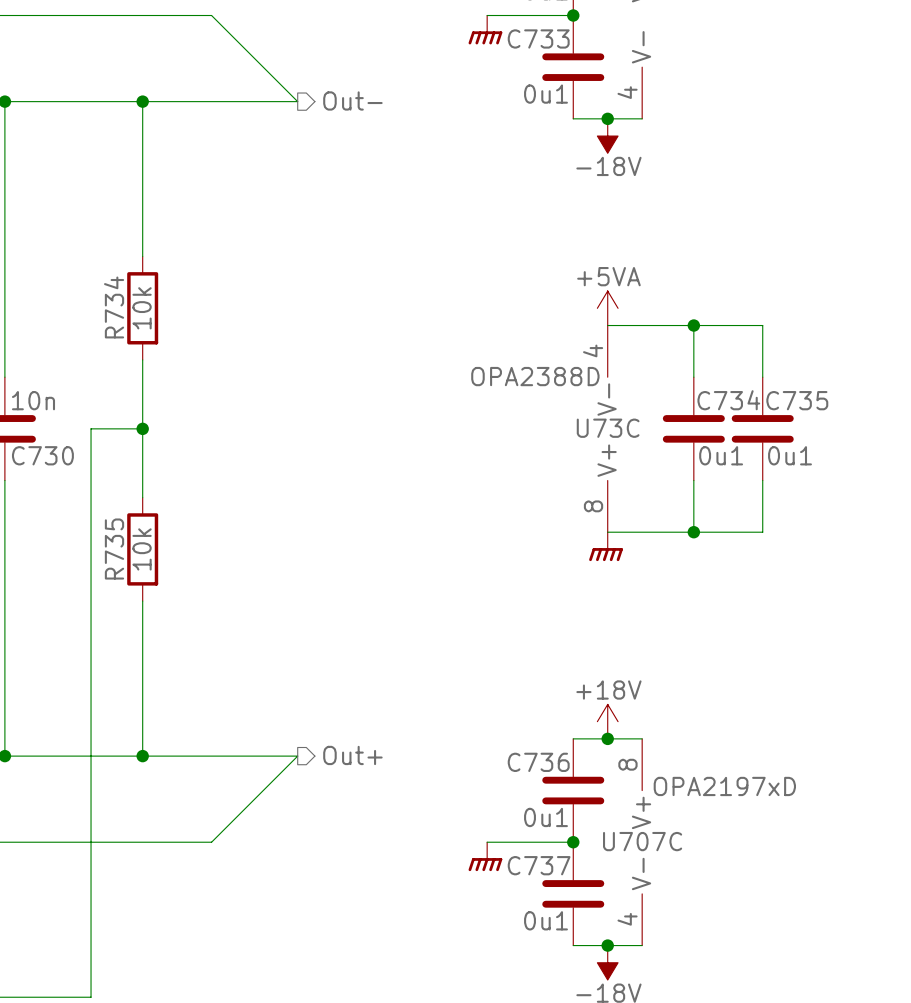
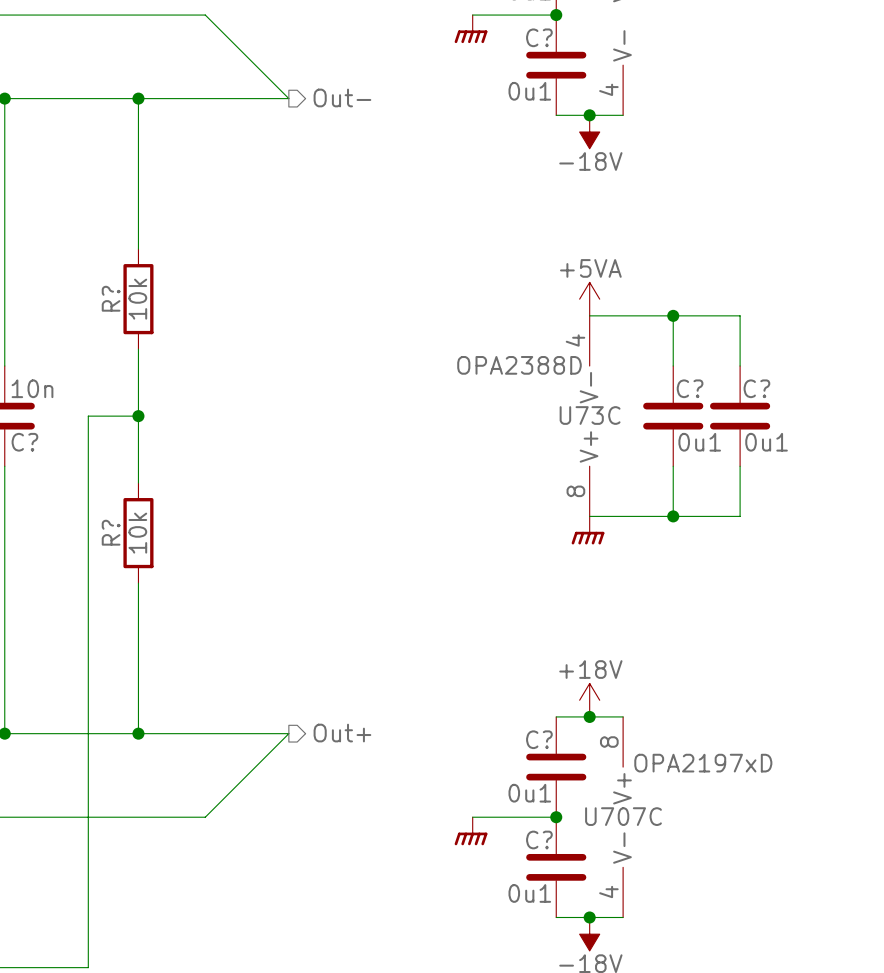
C733 name: C733 (538, 38) -> C? (539, 37)
R734 name: R734 (114, 307) -> R? (111, 298)
C734 name: C734 (728, 400) -> C? (690, 388)
C735 name: C735 (797, 400) -> C? (756, 388)
C730 name: C730 (42, 455) -> C? (24, 442)
R735 name: R735 (114, 549) -> R? (111, 532)
C736 name: C736 (538, 762) -> C? (539, 739)
C737 name: C737 (539, 865) -> C? (539, 839)

